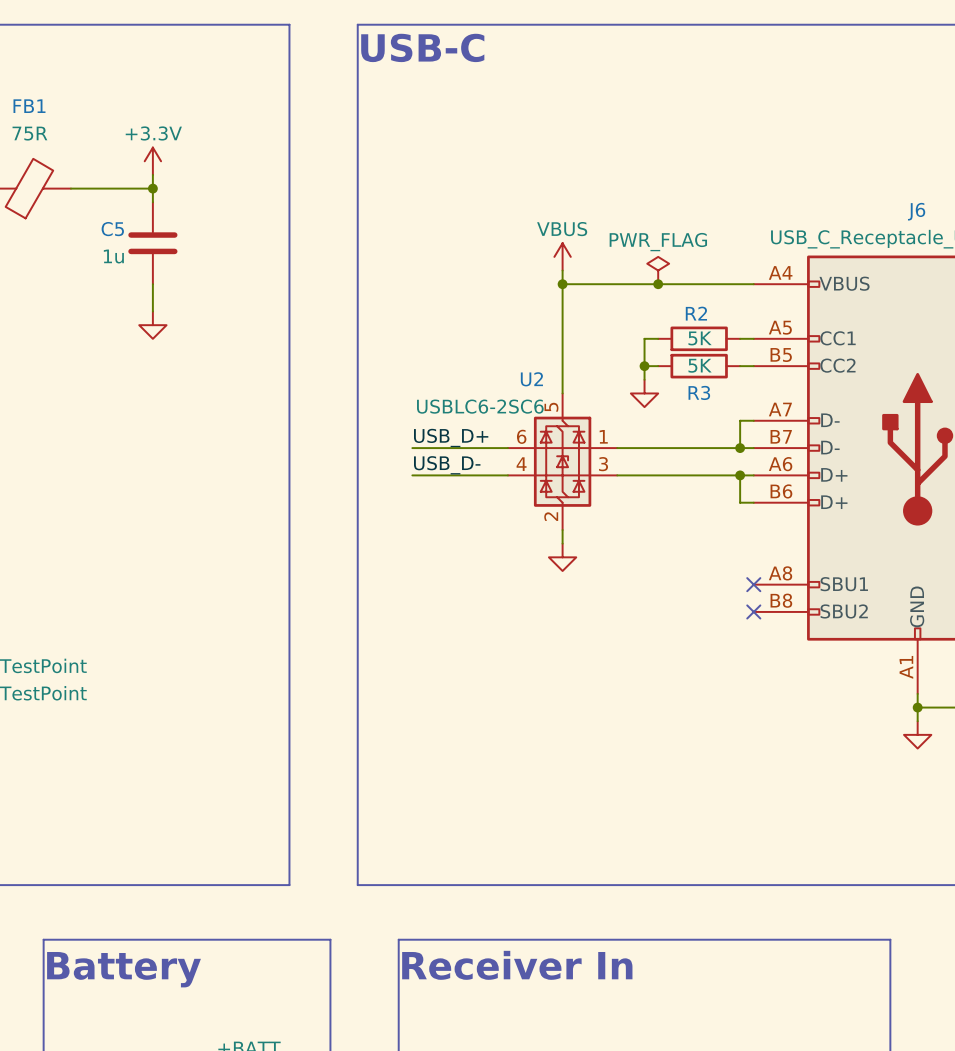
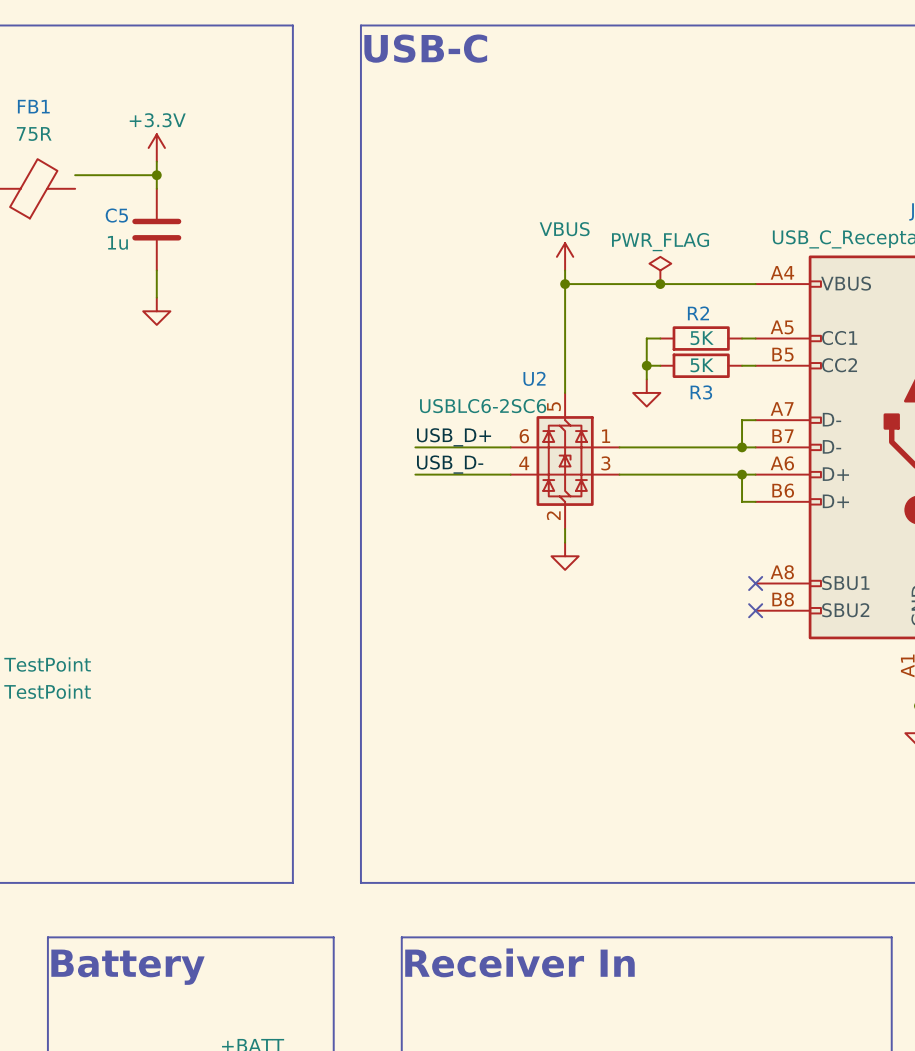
wire: none -> (156, 161) (156, 175) (75, 175)
power symbol position: +3.3V (152, 161) -> +3.3V (156, 147)
wire: (70, 188) (152, 188) (152, 202) -> none
junction position: (152, 188) -> (156, 175)
C5 position: (152, 243) -> (156, 229)
power symbol position: (152, 325) -> (156, 311)

